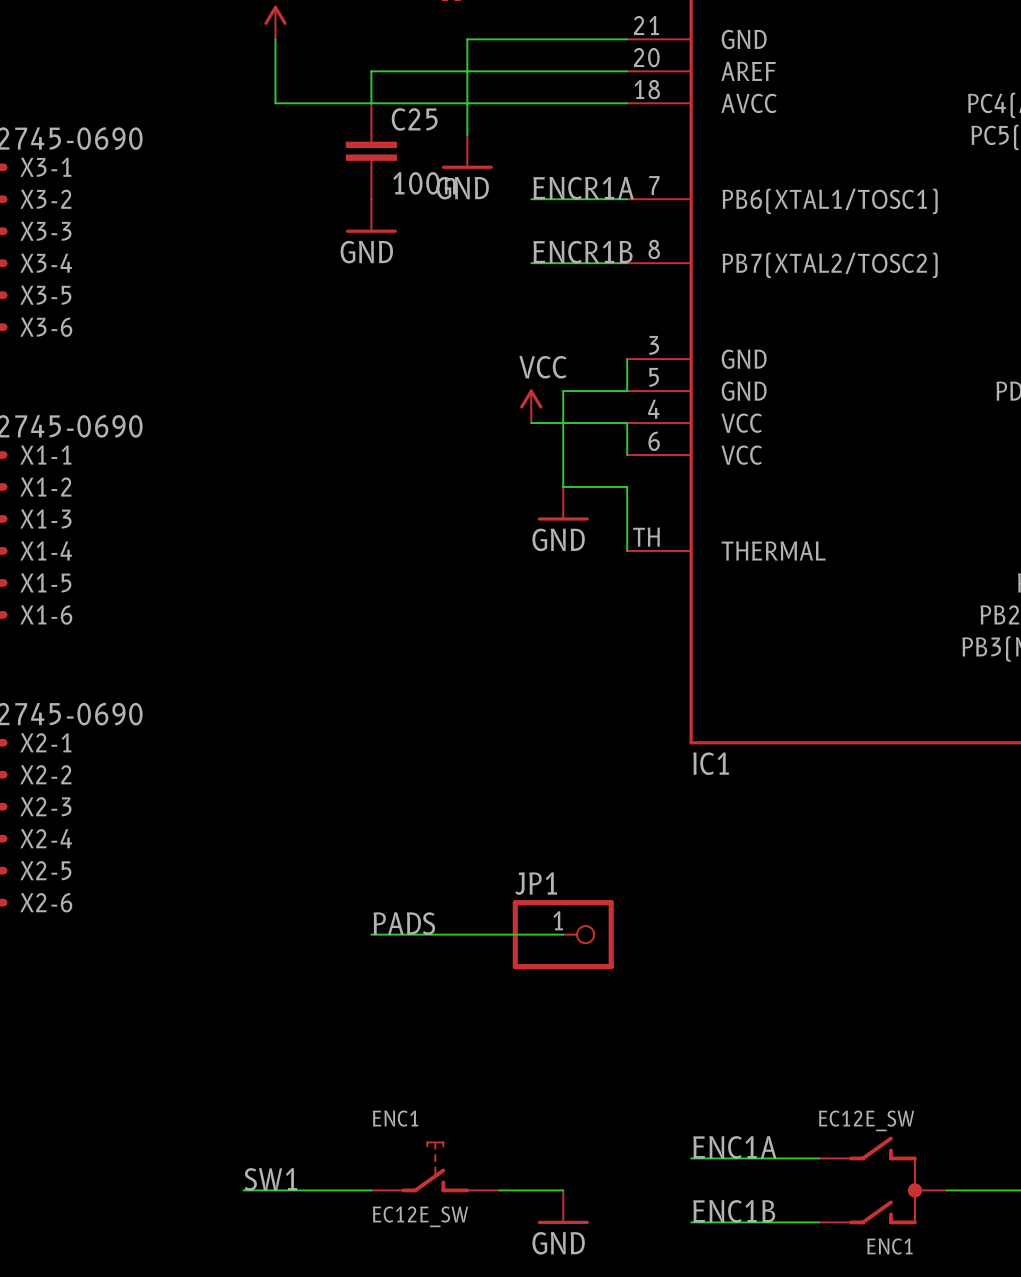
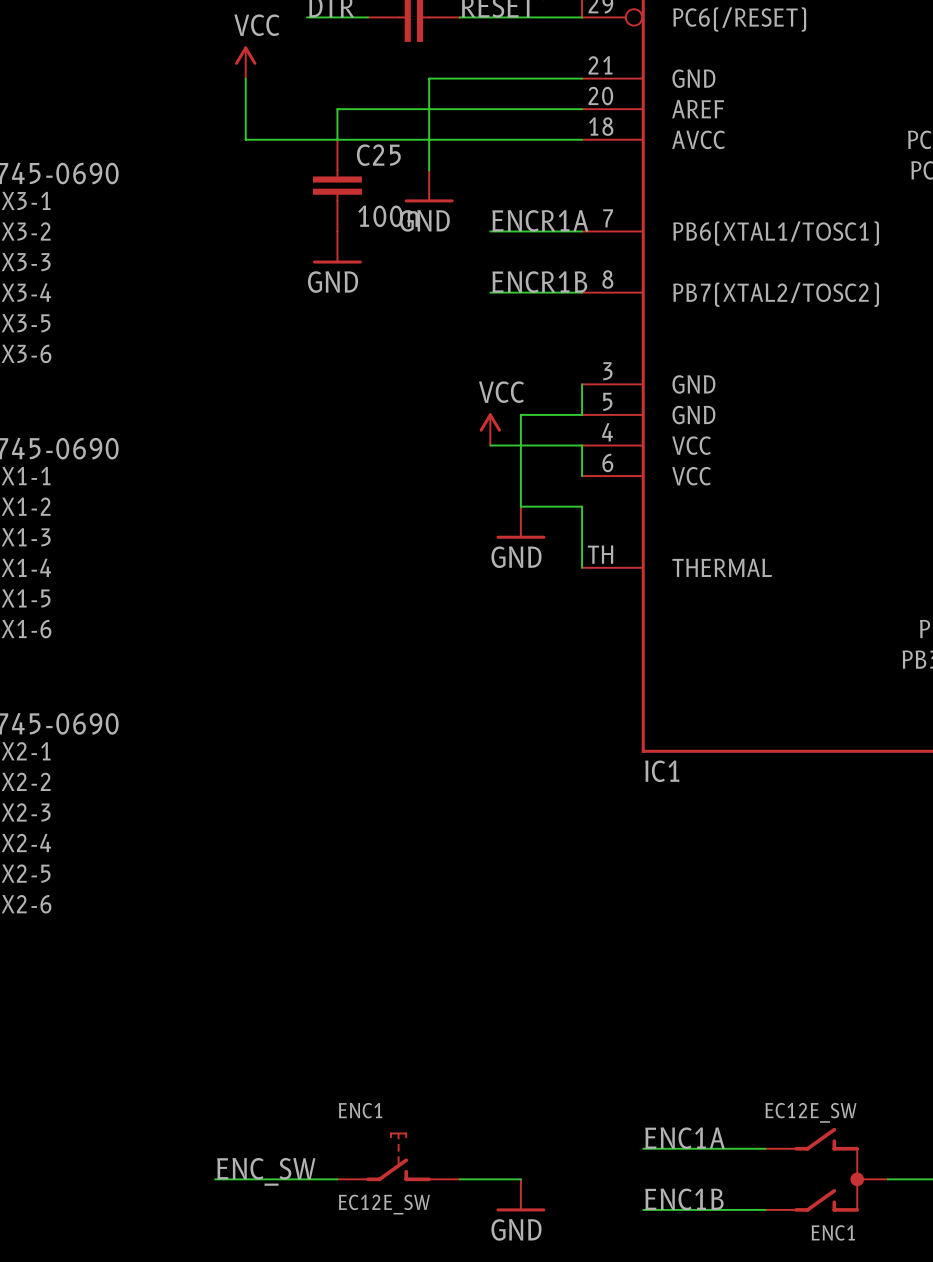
label: PADS (404, 923) -> none
wire: (371, 934) (563, 934) -> none
JP1: (563, 934) -> none
label: SW1 (270, 1179) -> ENC_SW (266, 1171)

